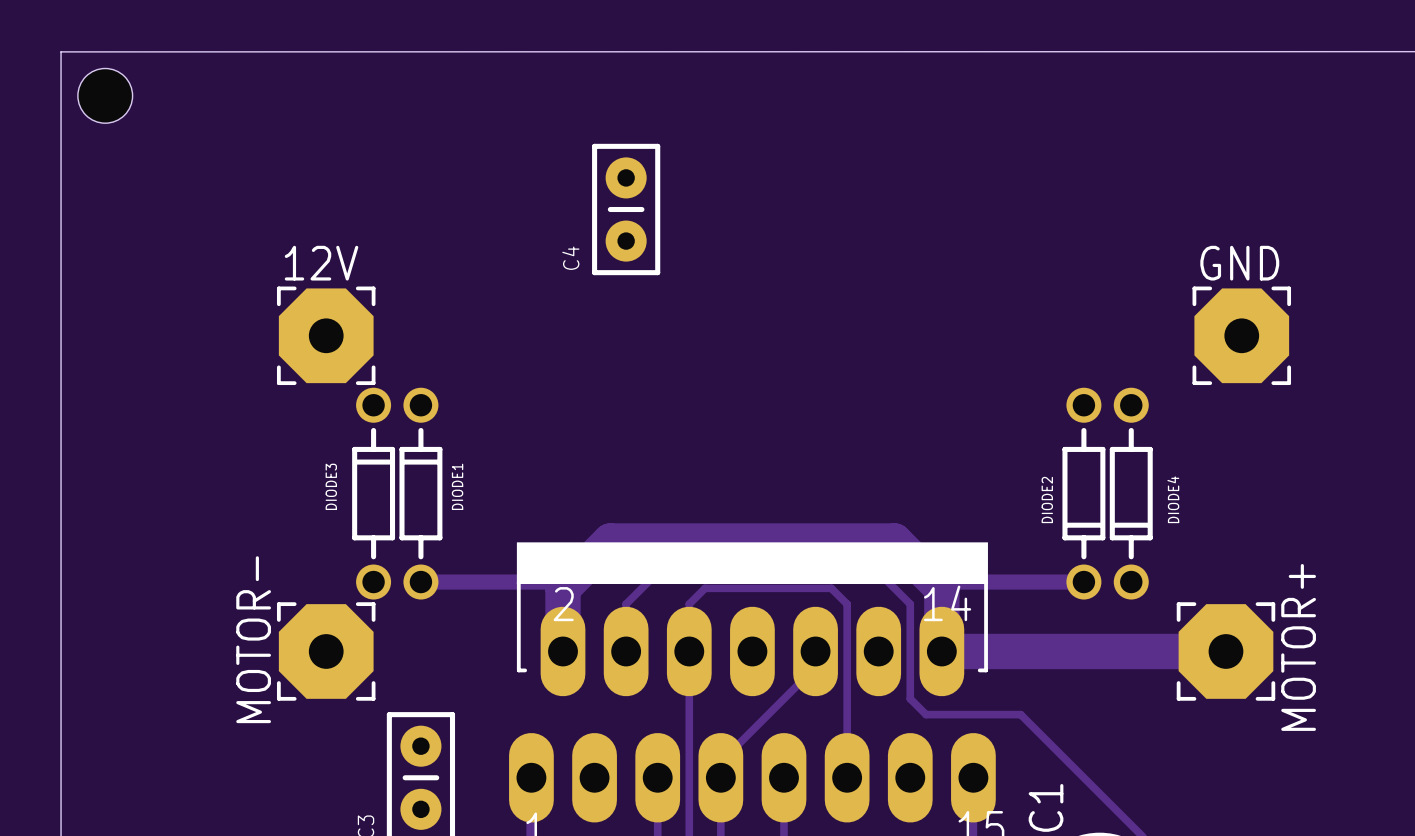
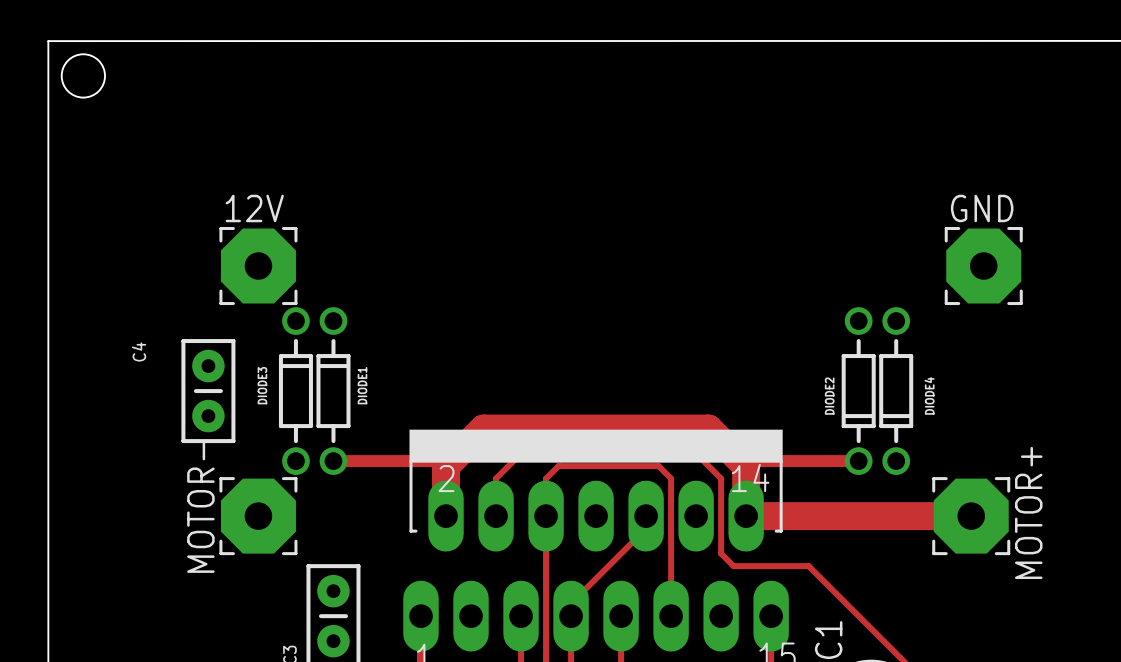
C4 position: (626, 209) -> (208, 391)
C4 name position: C4 (570, 258) -> C4 (139, 351)

